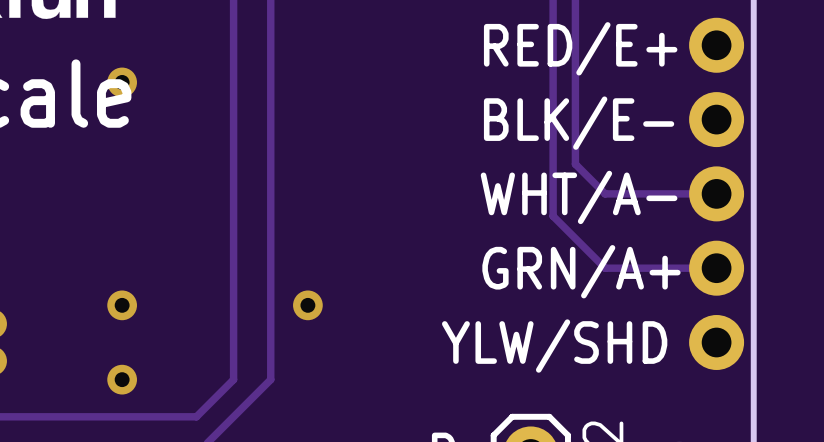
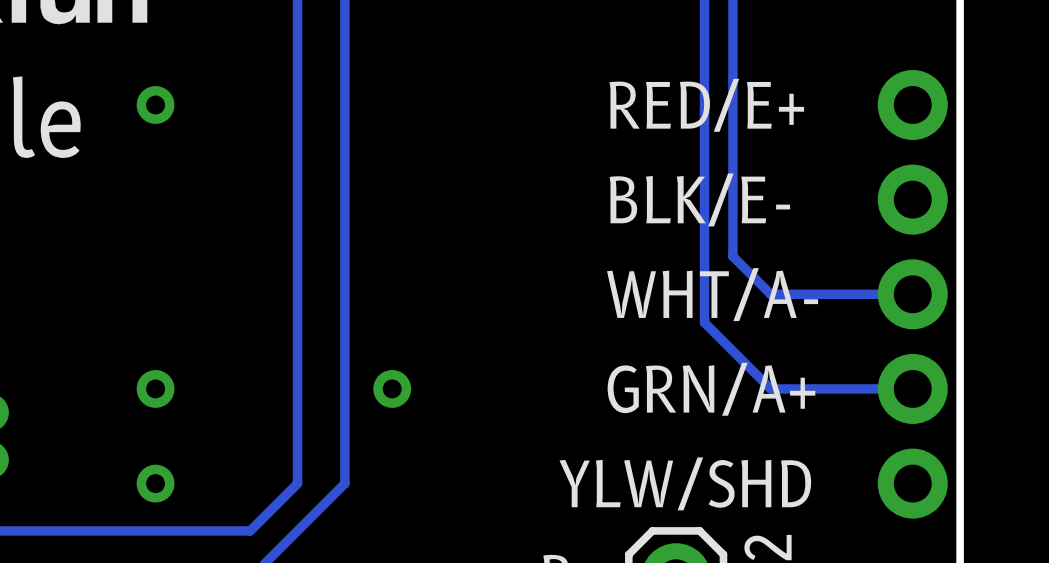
text position: RED/E+ (580, 48) -> RED/E+ (706, 105)
text position: BLK/E- (579, 123) -> BLK/E- (699, 199)
track: (575, 164) (605, 193) (716, 193) -> (732, 209) (732, 256) (770, 294) (912, 294)
part position: (716, 193) -> (912, 294)
text position: WHT/A- (579, 197) -> WHT/A- (712, 294)
track: (553, 216) (605, 268) (716, 268) -> (704, 275) (704, 322) (770, 388) (912, 388)
text position: GRN/A+ (581, 271) -> GRN/A+ (711, 389)
text position: YLW/SHD (554, 346) -> YLW/SHD (685, 483)

